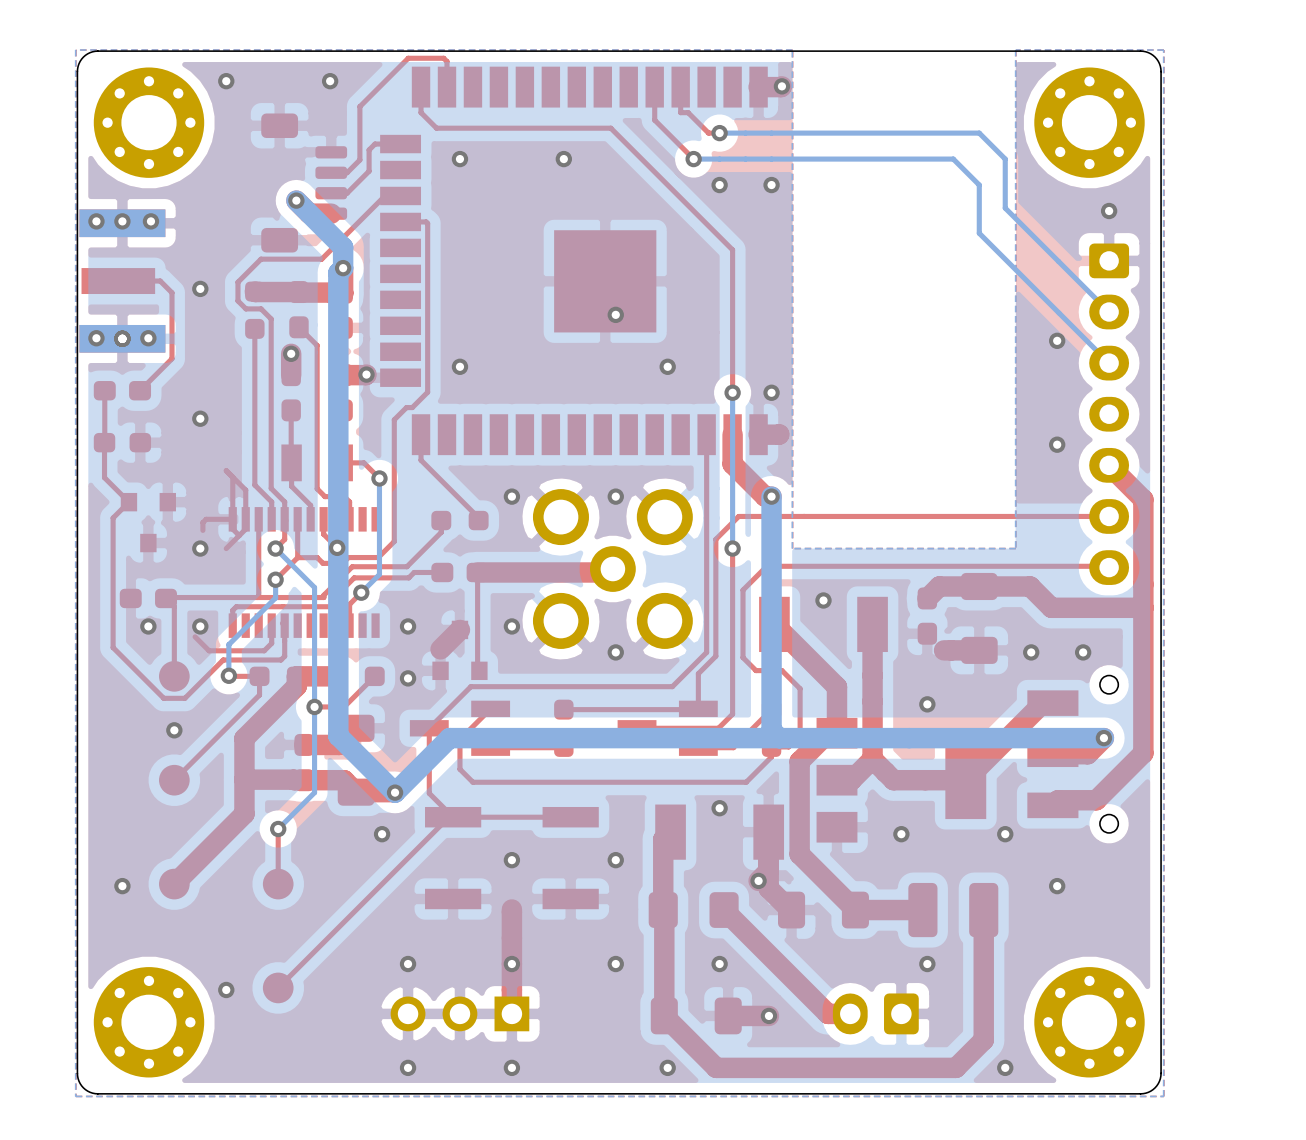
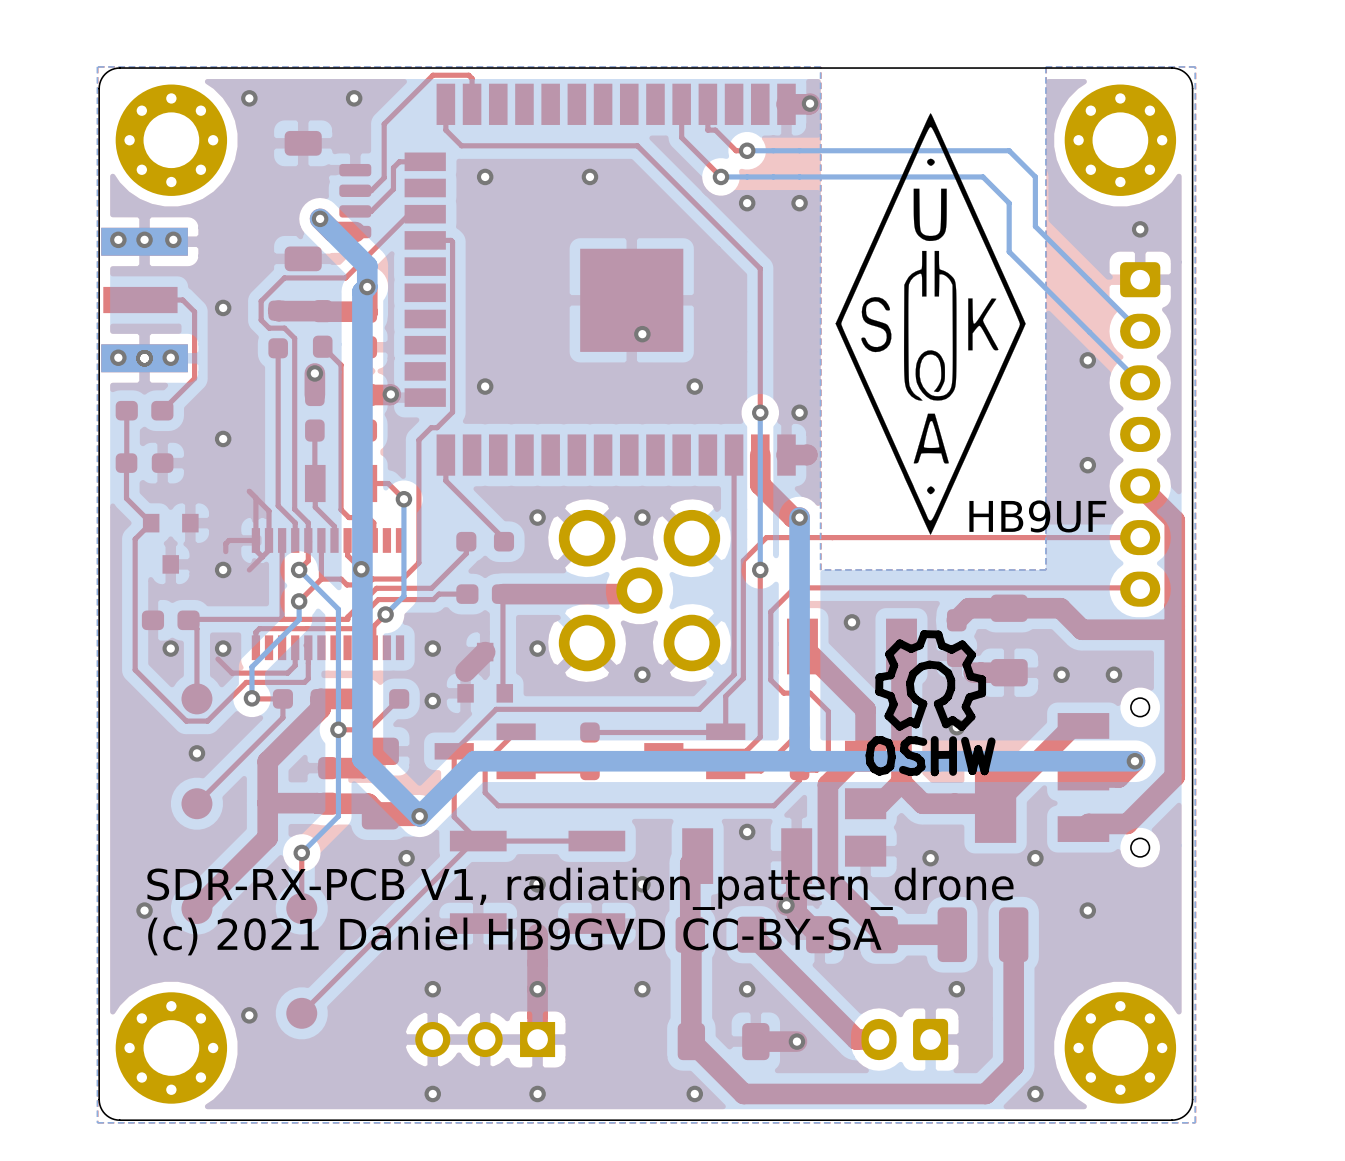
drawing: none -> [835, 113, 1026, 535]
text: none -> HB9UF (1037, 516)
drawing: none -> [865, 630, 996, 777]
text: none -> SDR-RX-PCB V1, radiation_pattern_drone (580, 888)
text: none -> (c) 2021 Daniel HB9GVD CC-BY-SA (514, 936)

